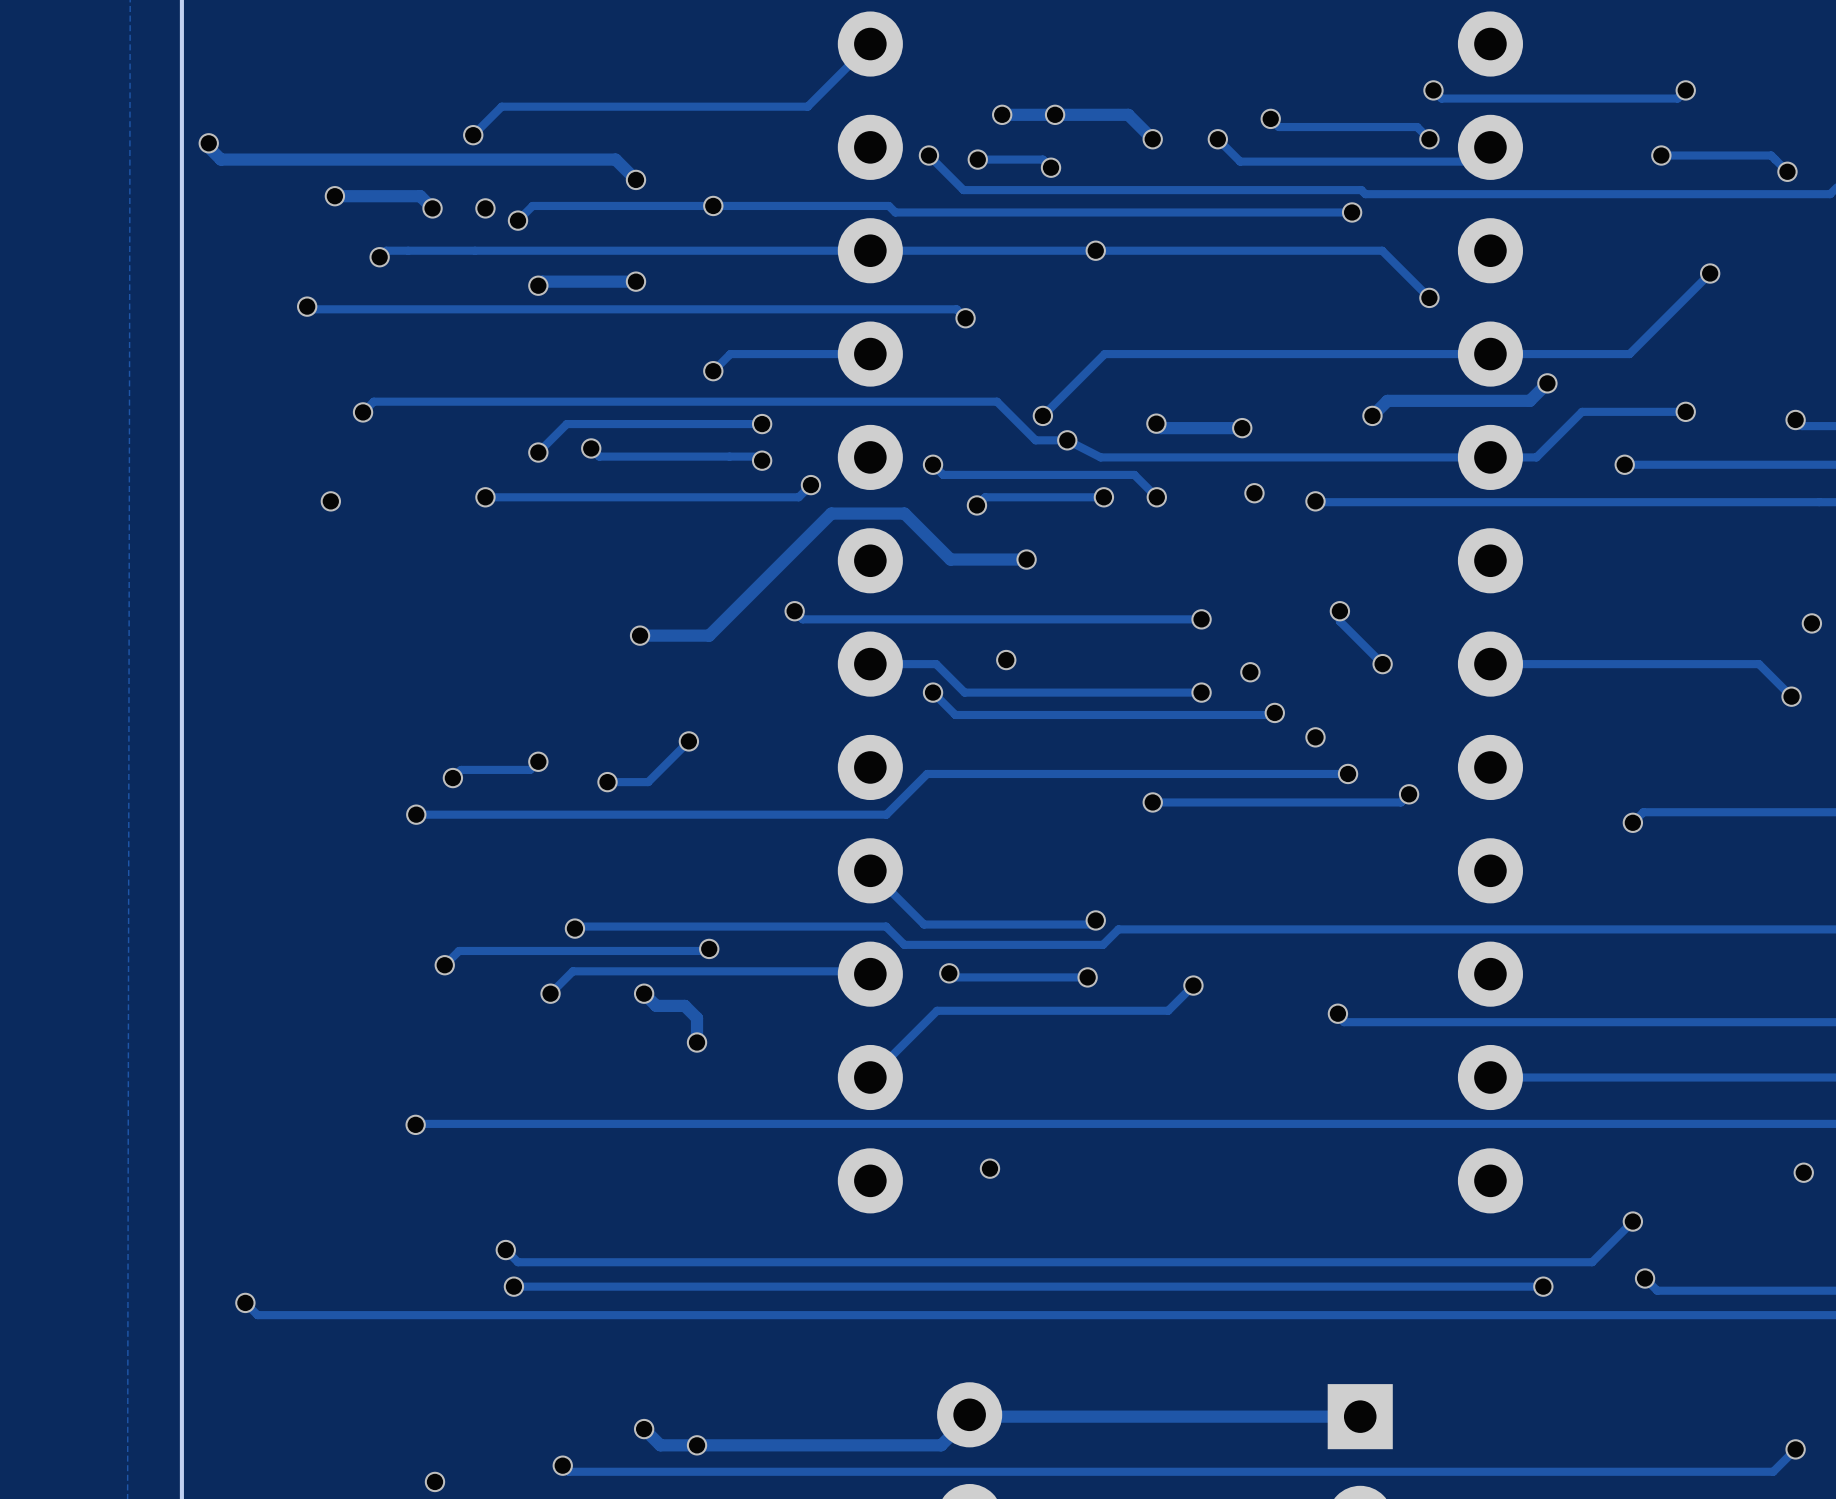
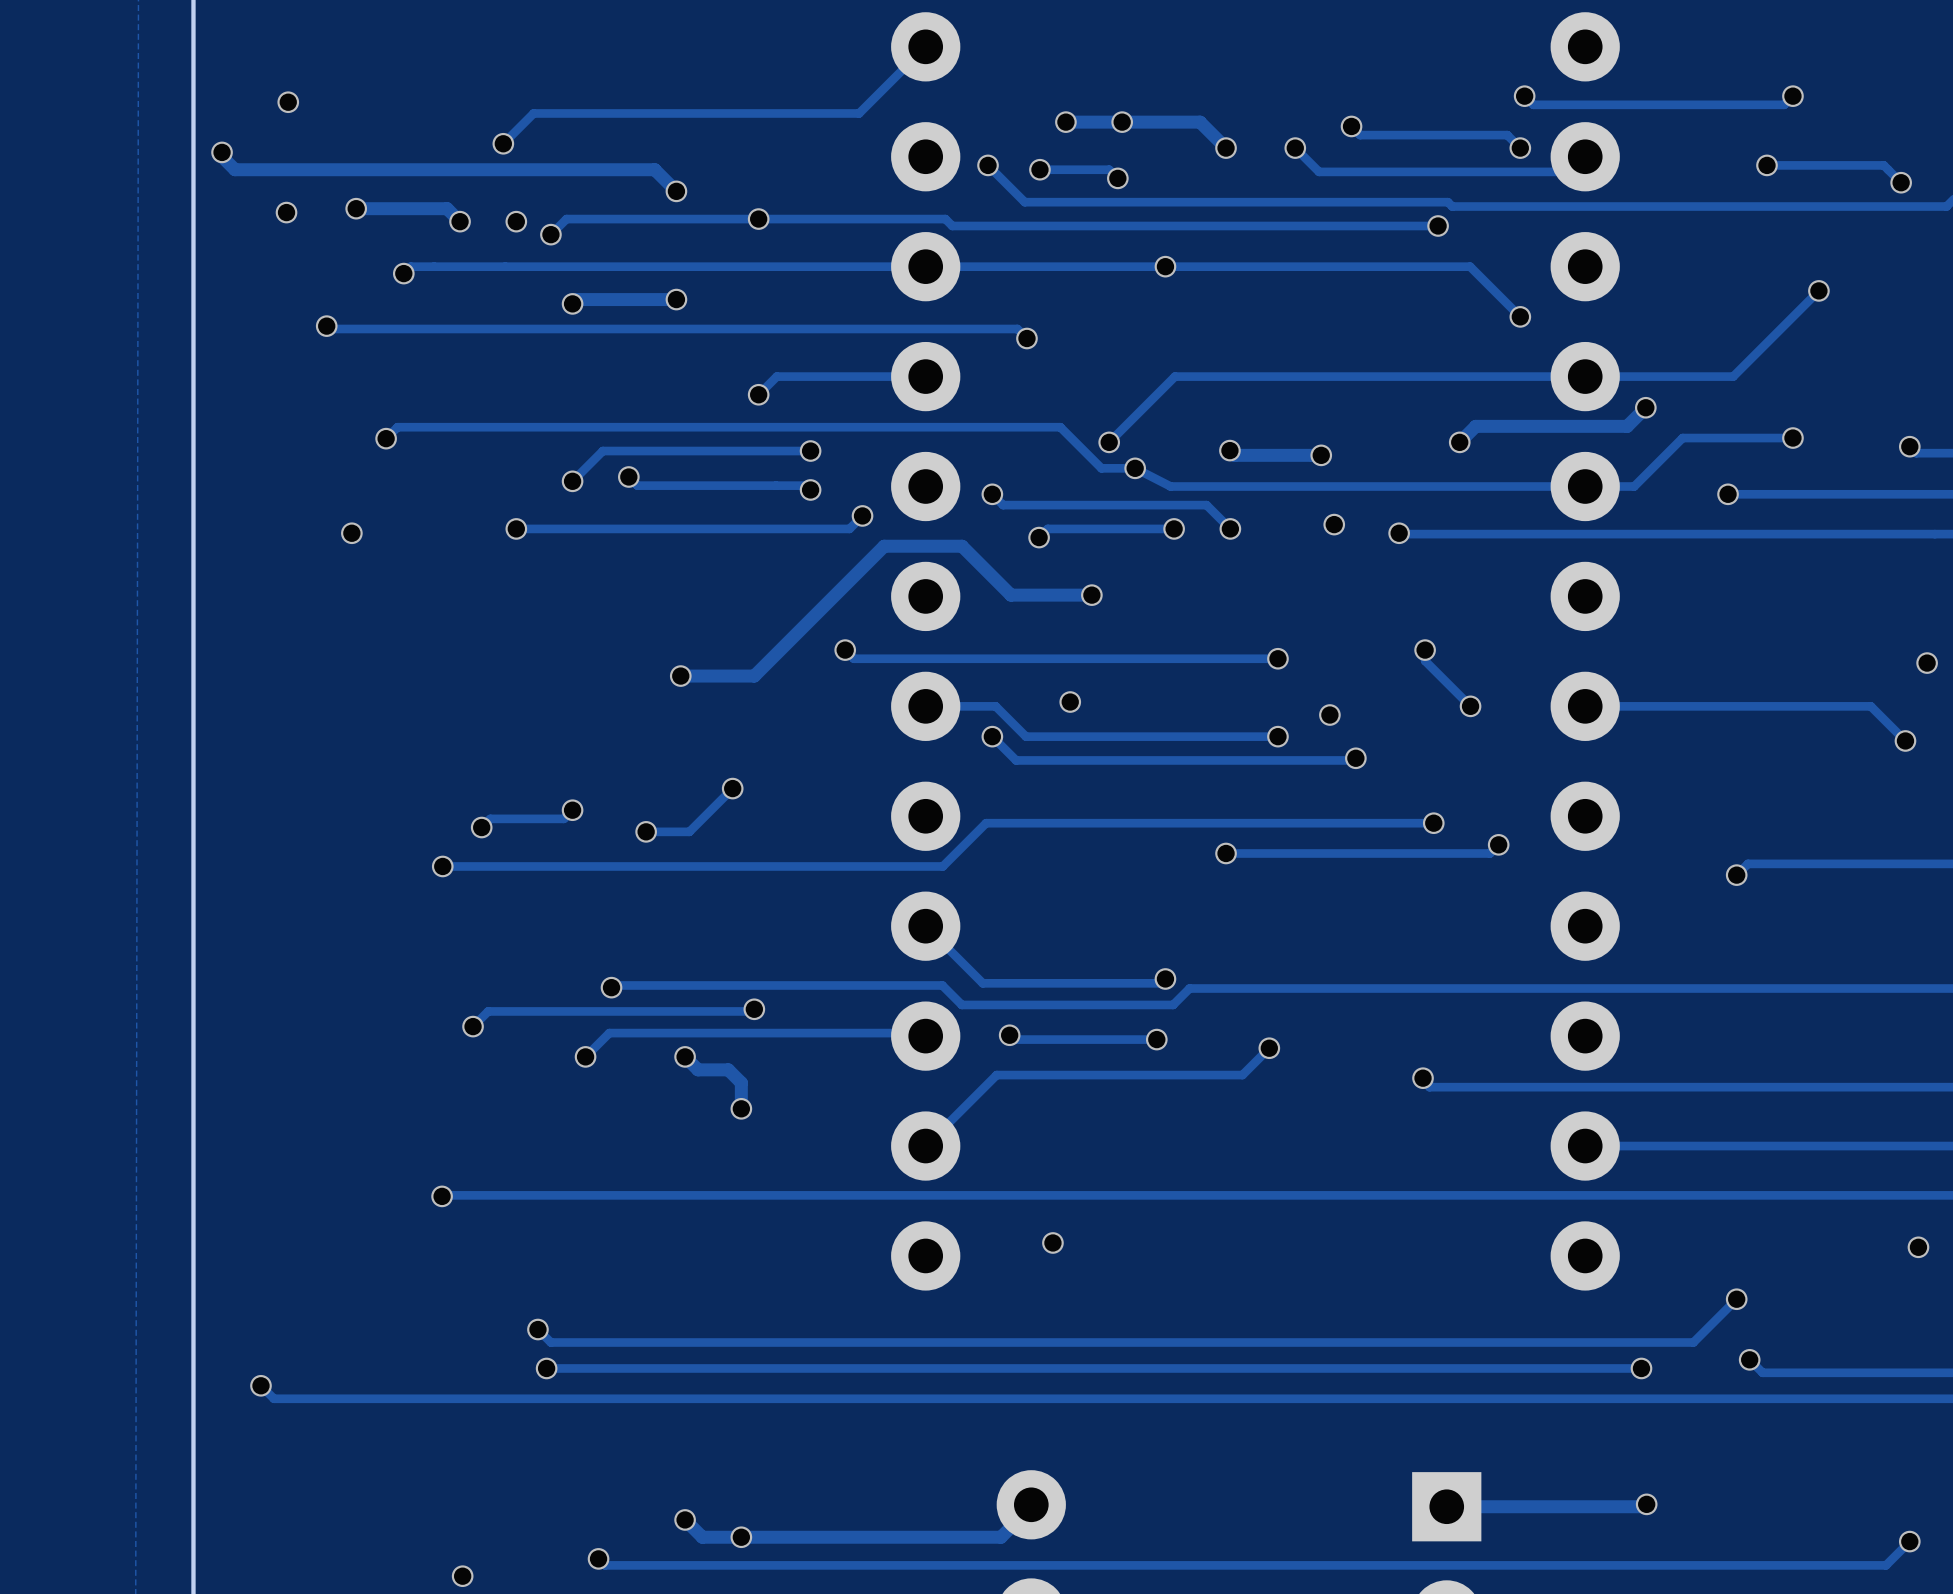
via: none -> (288, 102)
via: none -> (286, 212)
via: (1315, 737) -> none
via: none -> (1646, 1504)
track: (1360, 1416) (971, 1416) -> (1446, 1506) (1644, 1506) (1646, 1504)

